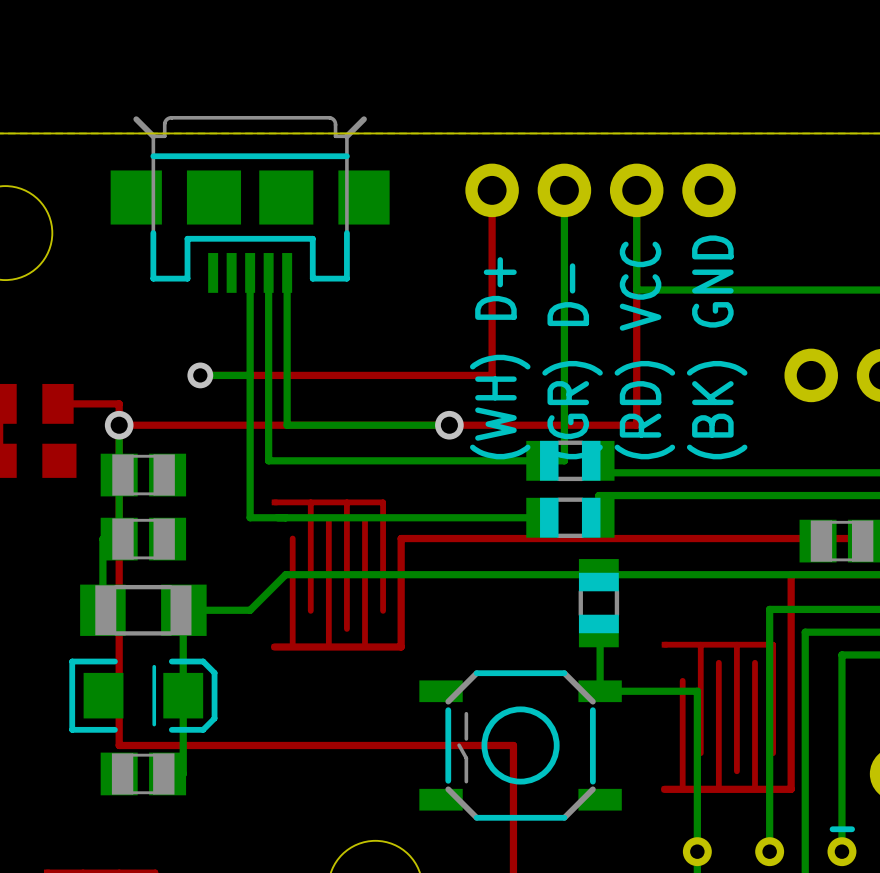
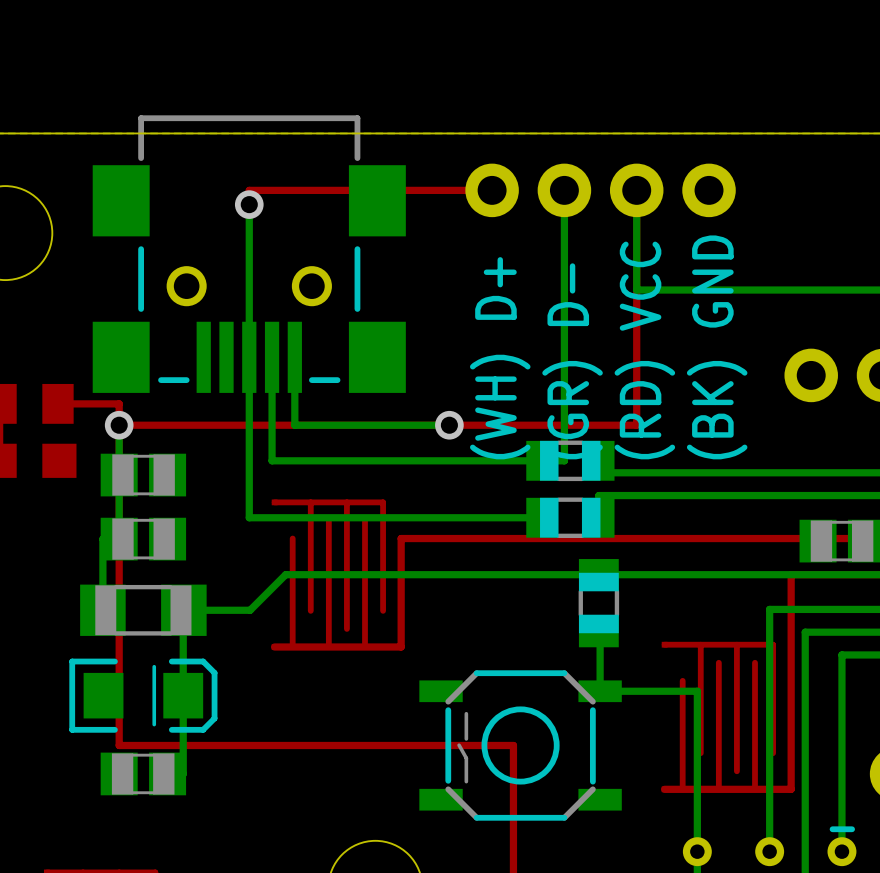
top track: (492, 190) (492, 375) (200, 375) -> (492, 190) (249, 190) (249, 204)
via: none -> (249, 204)
part: (250, 204) -> none
part: none -> (249, 254)
bottom track: (250, 272) (250, 517) -> (249, 204) (250, 517)
bottom track: (268, 272) (268, 460) (272, 460) -> (272, 357) (272, 460)
bottom track: (287, 272) (287, 425) (294, 425) -> (294, 357) (294, 425)
via: (200, 375) -> none
bottom track: (250, 375) (200, 375) -> none

